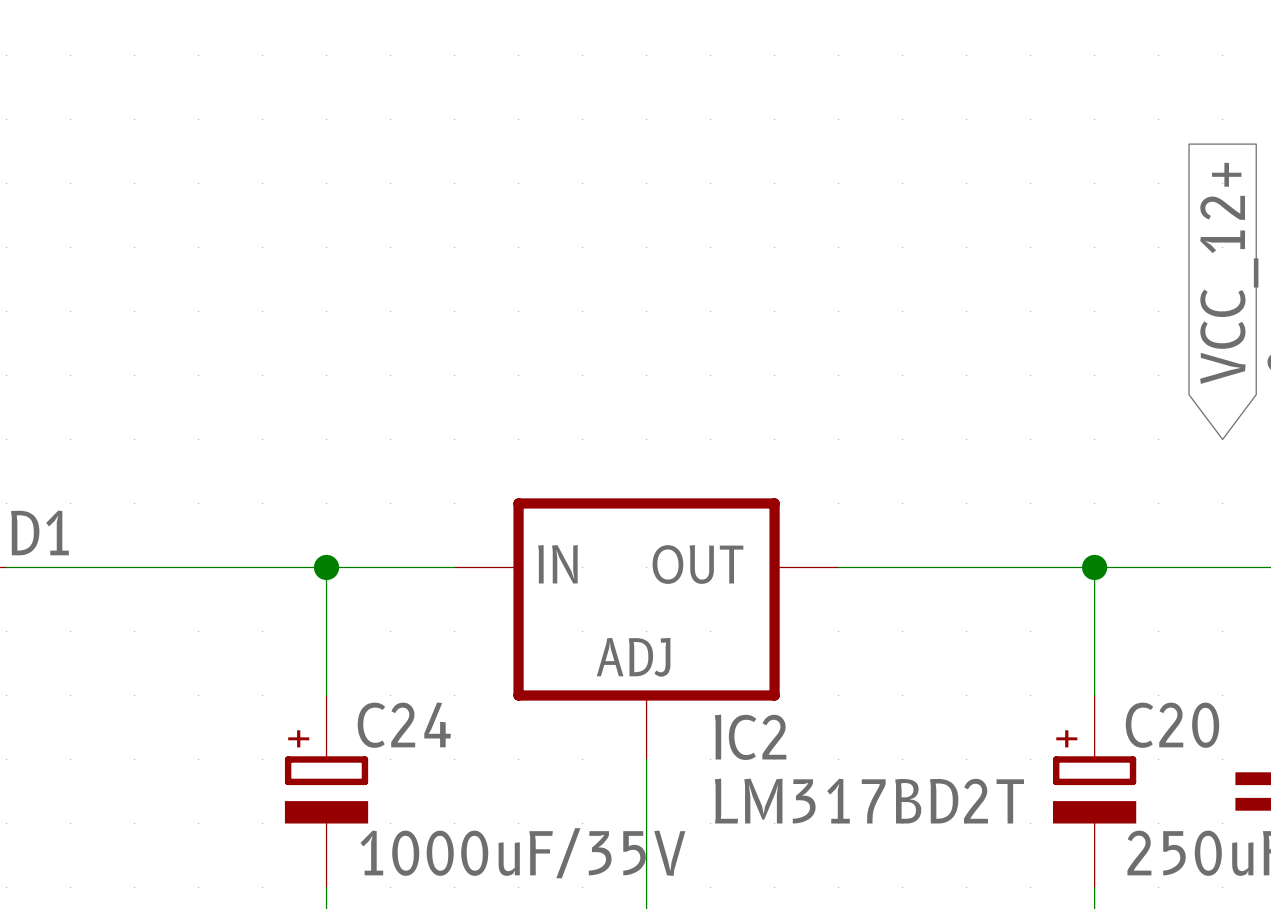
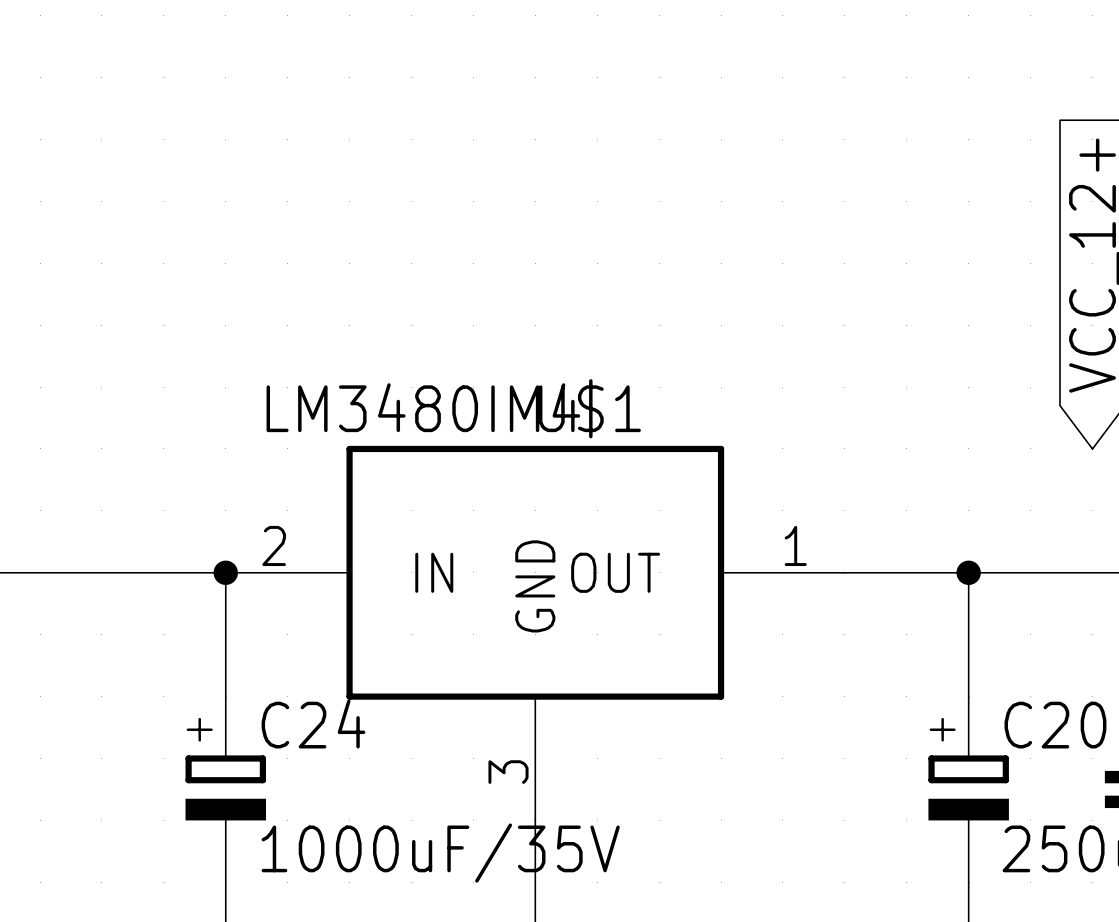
IC2: LM317BD2T (646, 628) -> none
U$1: none -> LM3480IM4 (535, 633)

